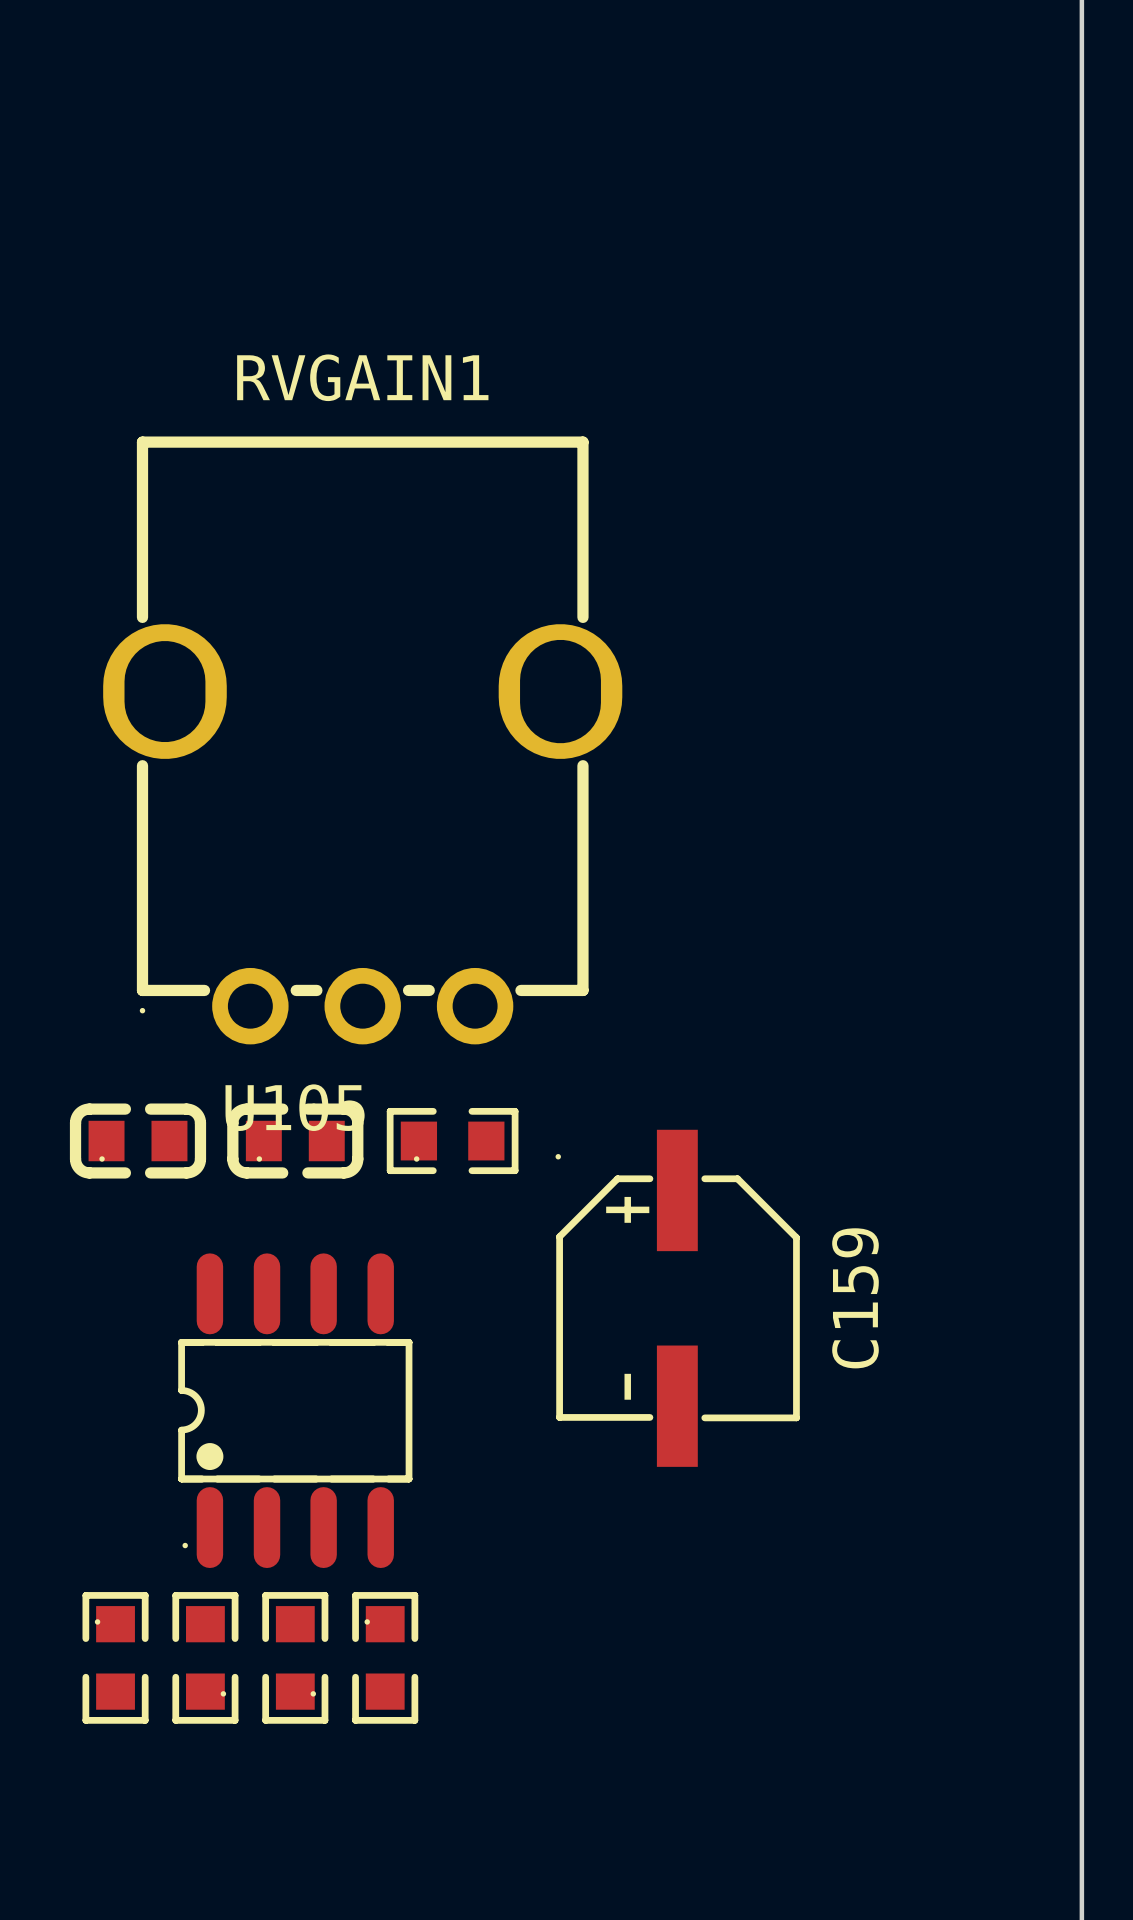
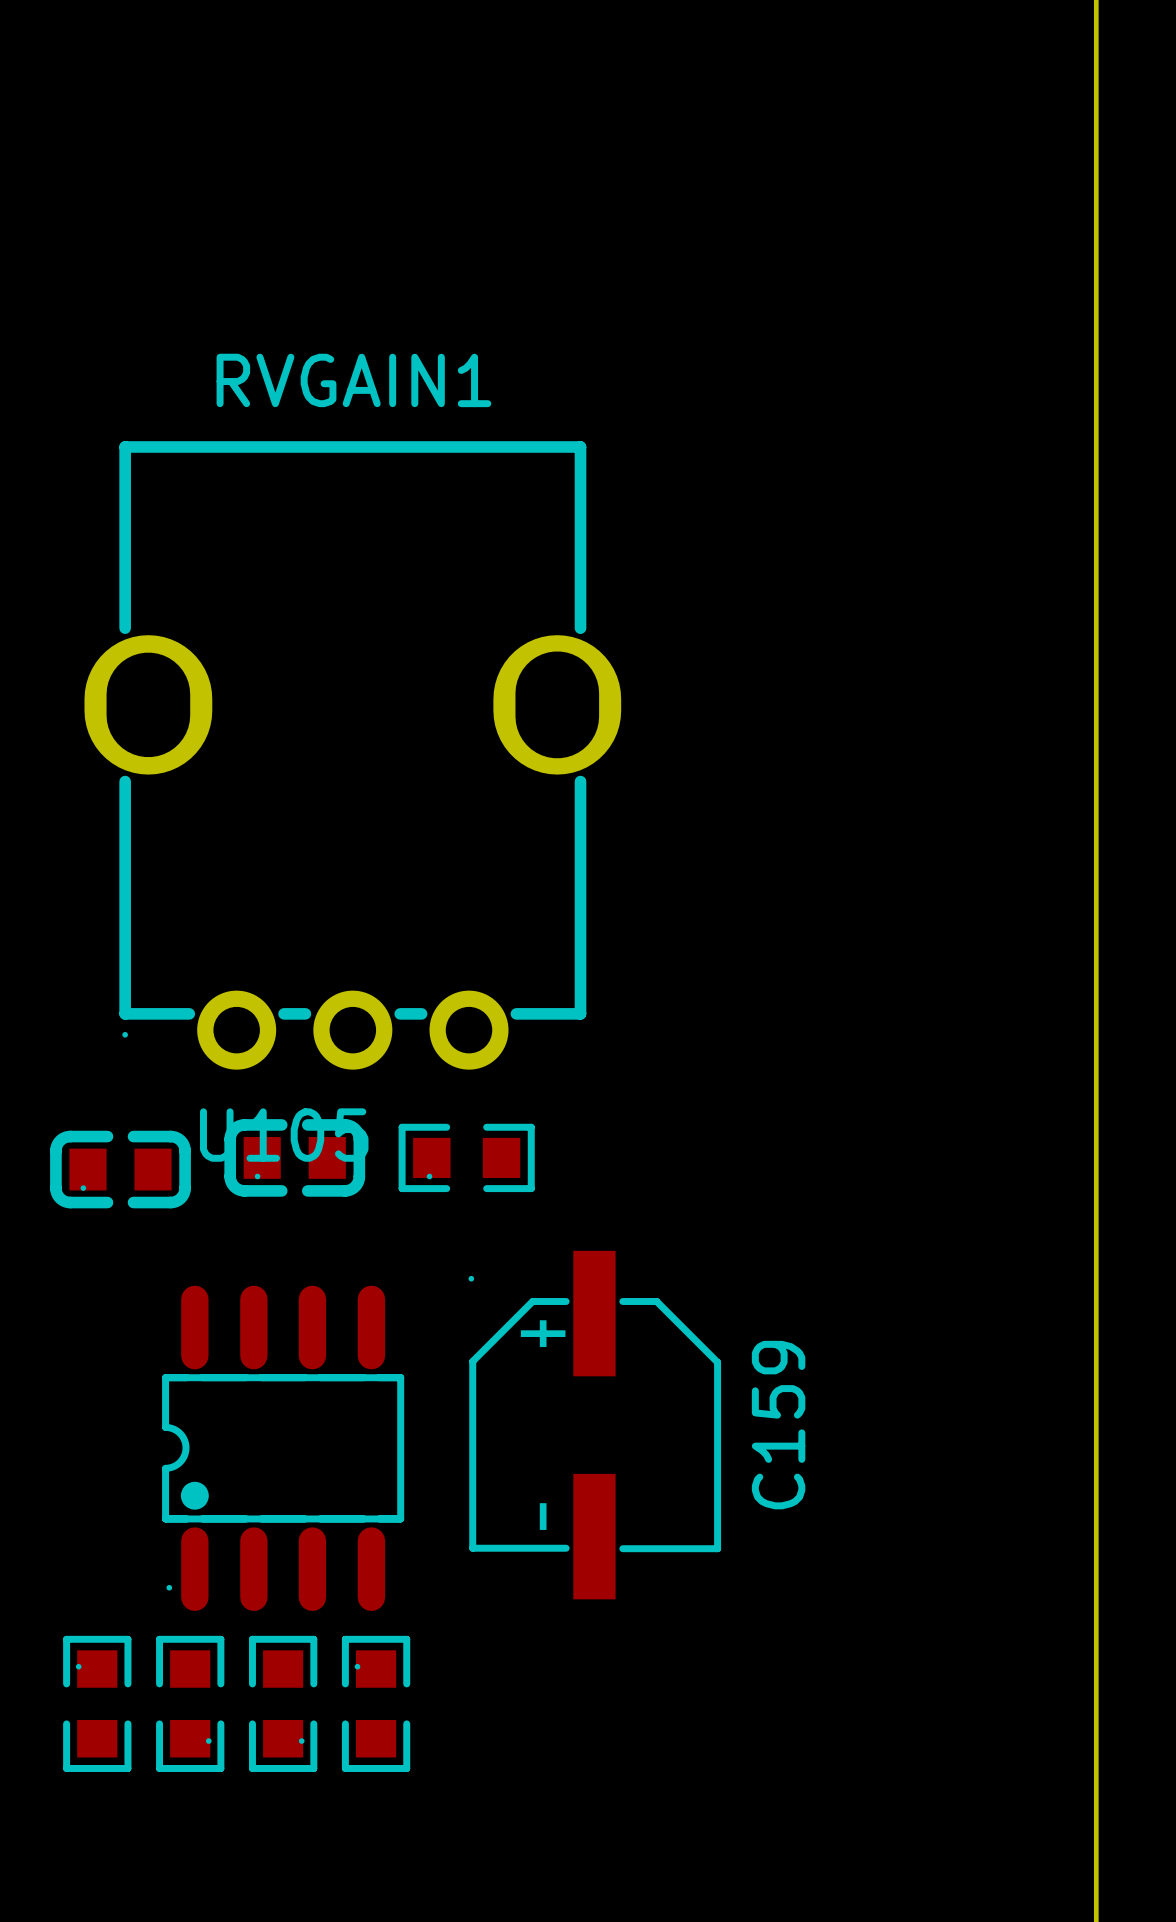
part position: (295, 1141) -> (294, 1157)
part position: (452, 1141) -> (466, 1157)
C159 position: (677, 1298) -> (594, 1425)

